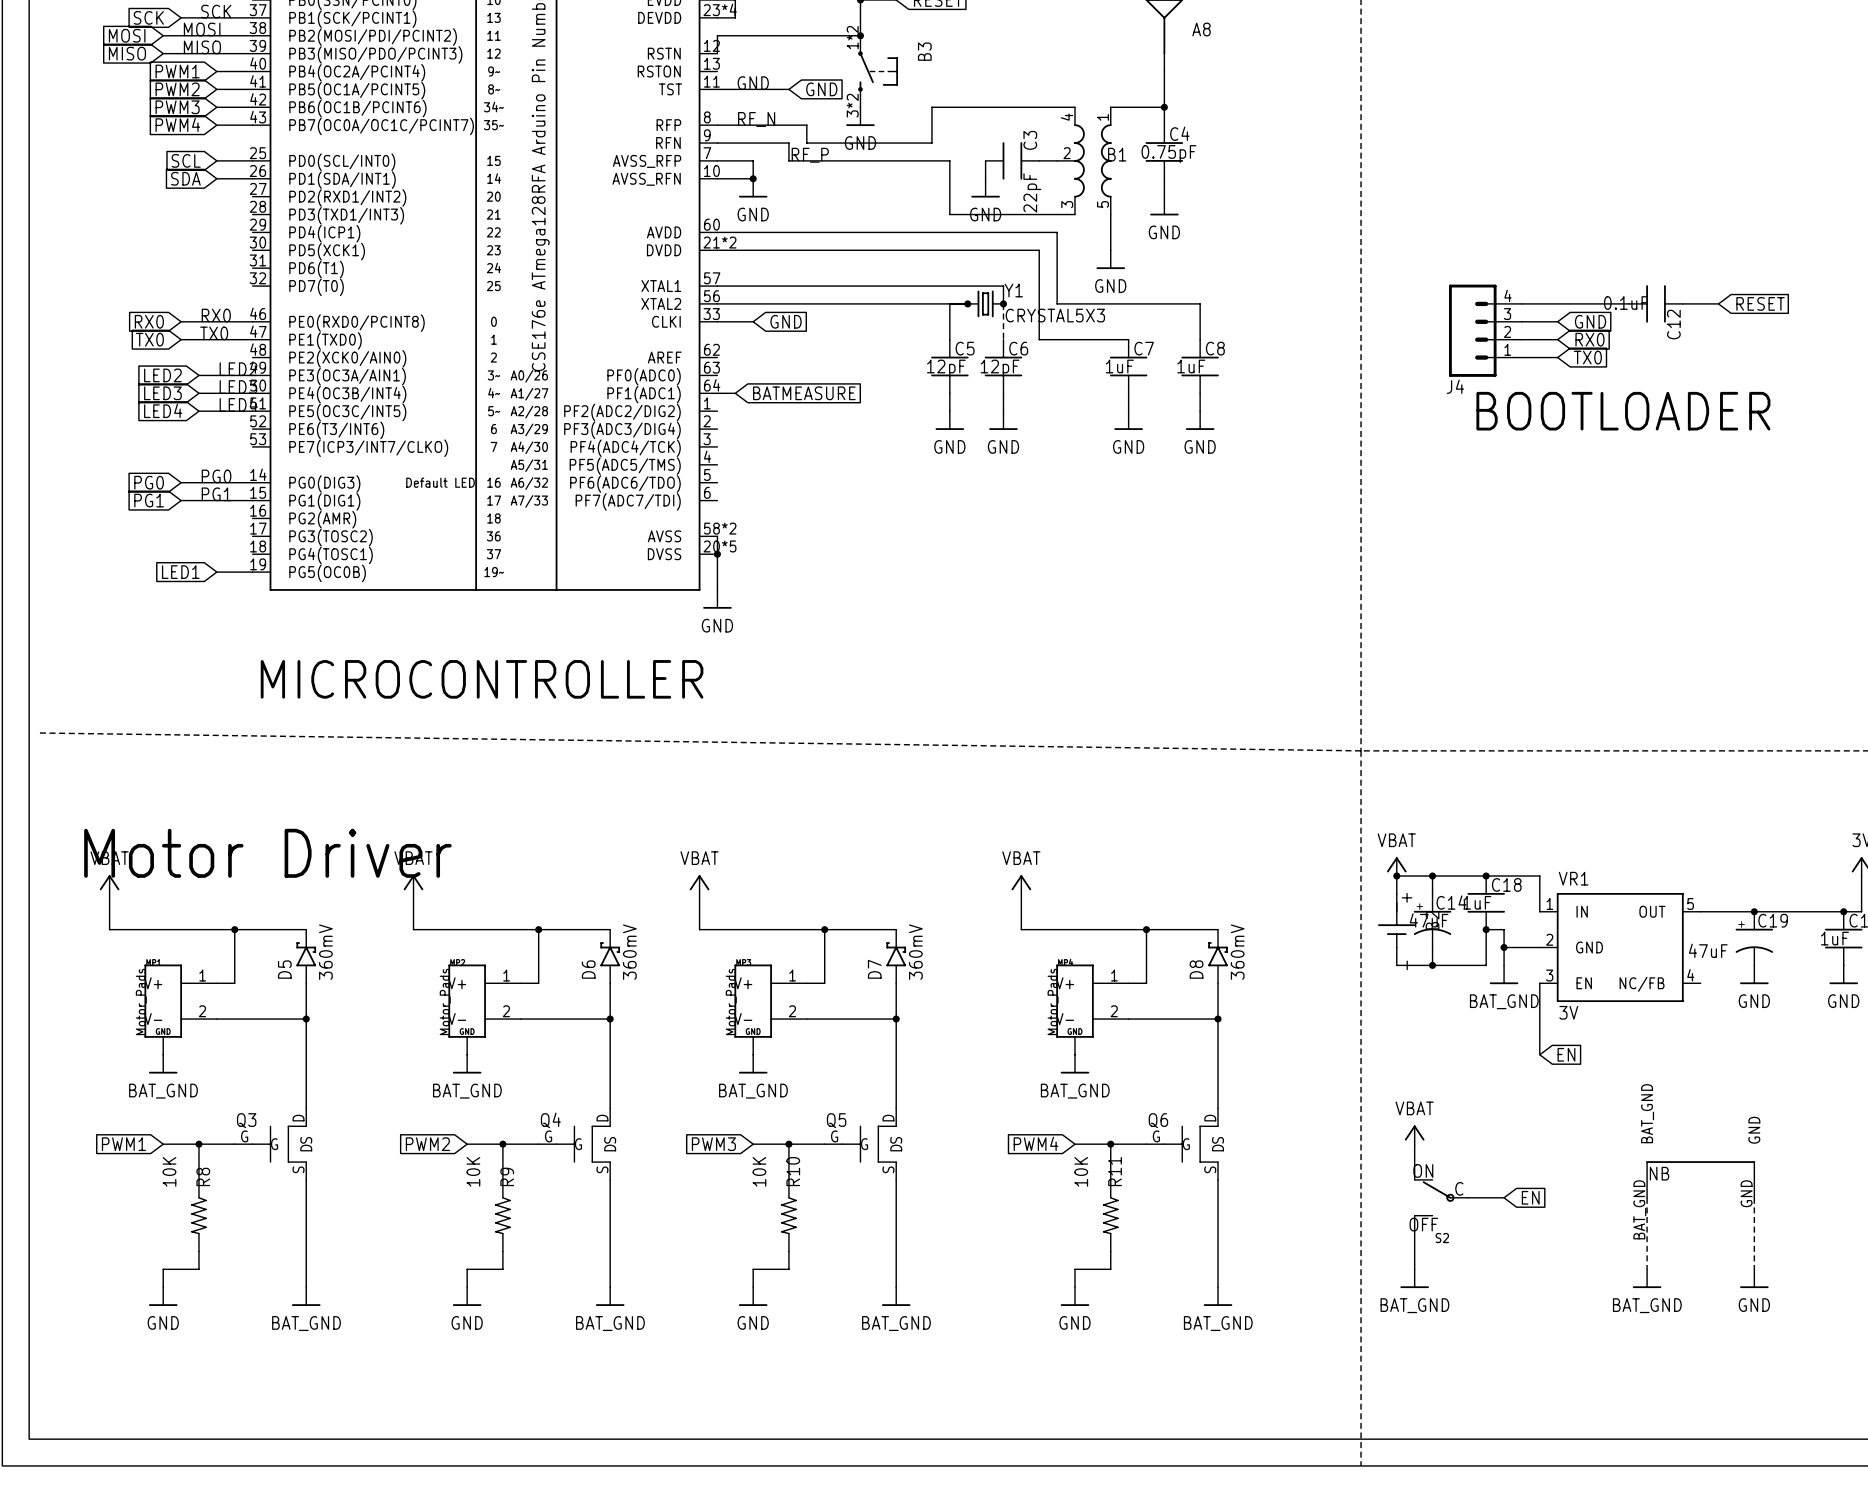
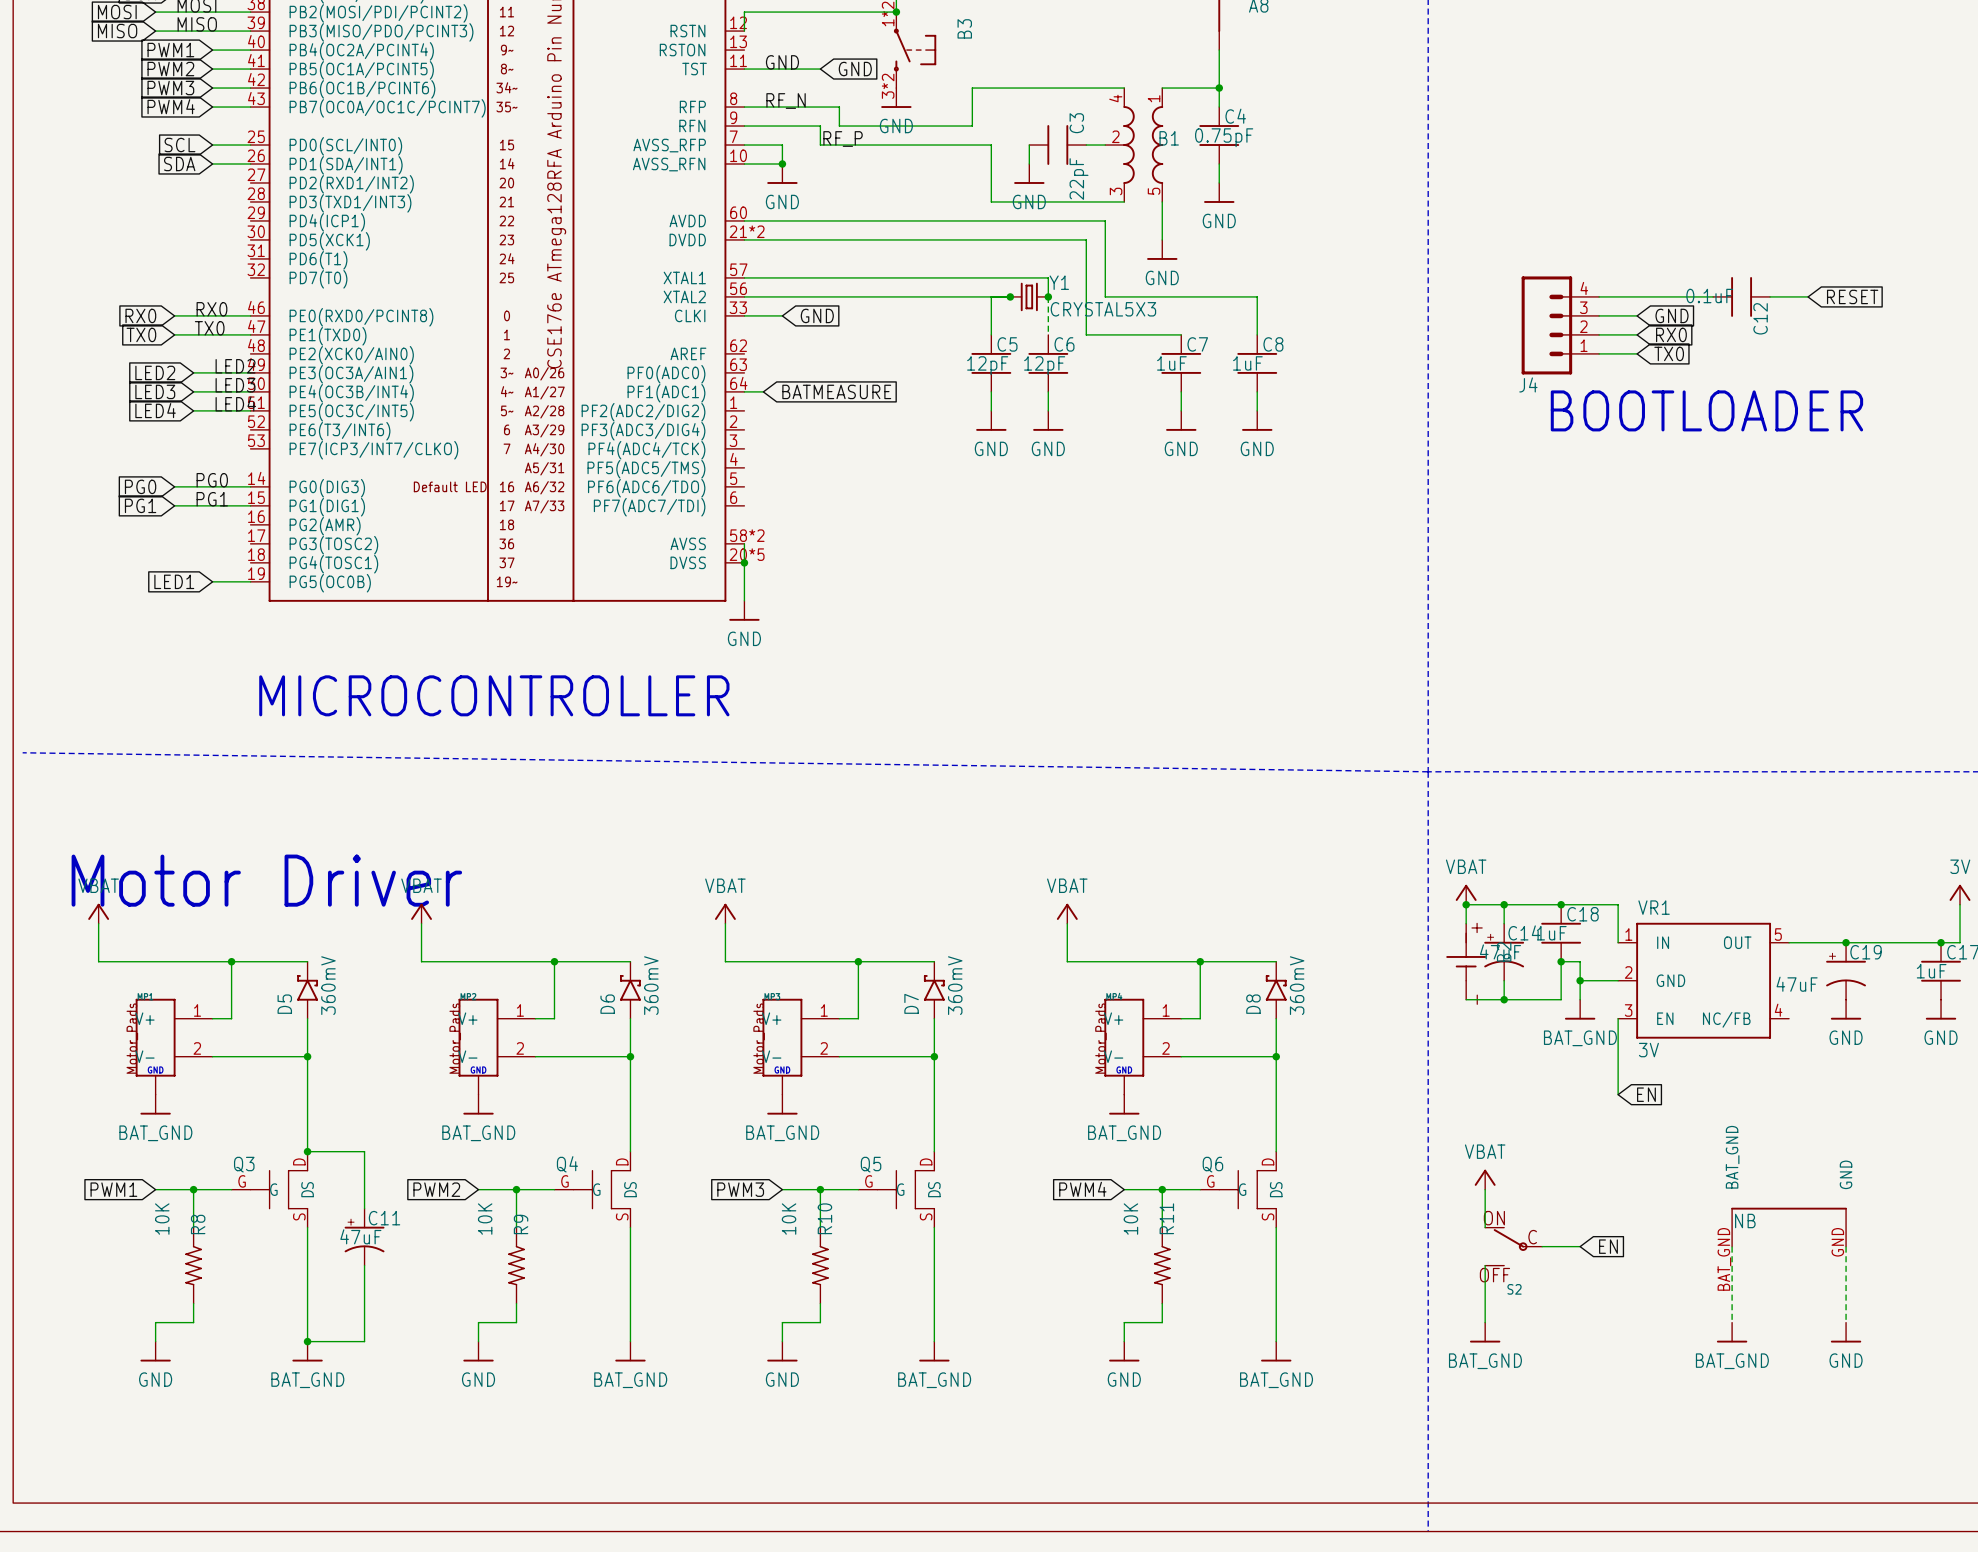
wire: none -> (307, 1151) (364, 1151) (364, 1208)
junction: none -> (307, 1151)
C11: none -> 47uF (364, 1237)
wire: none -> (364, 1265) (364, 1341) (307, 1341)
junction: none -> (307, 1341)

